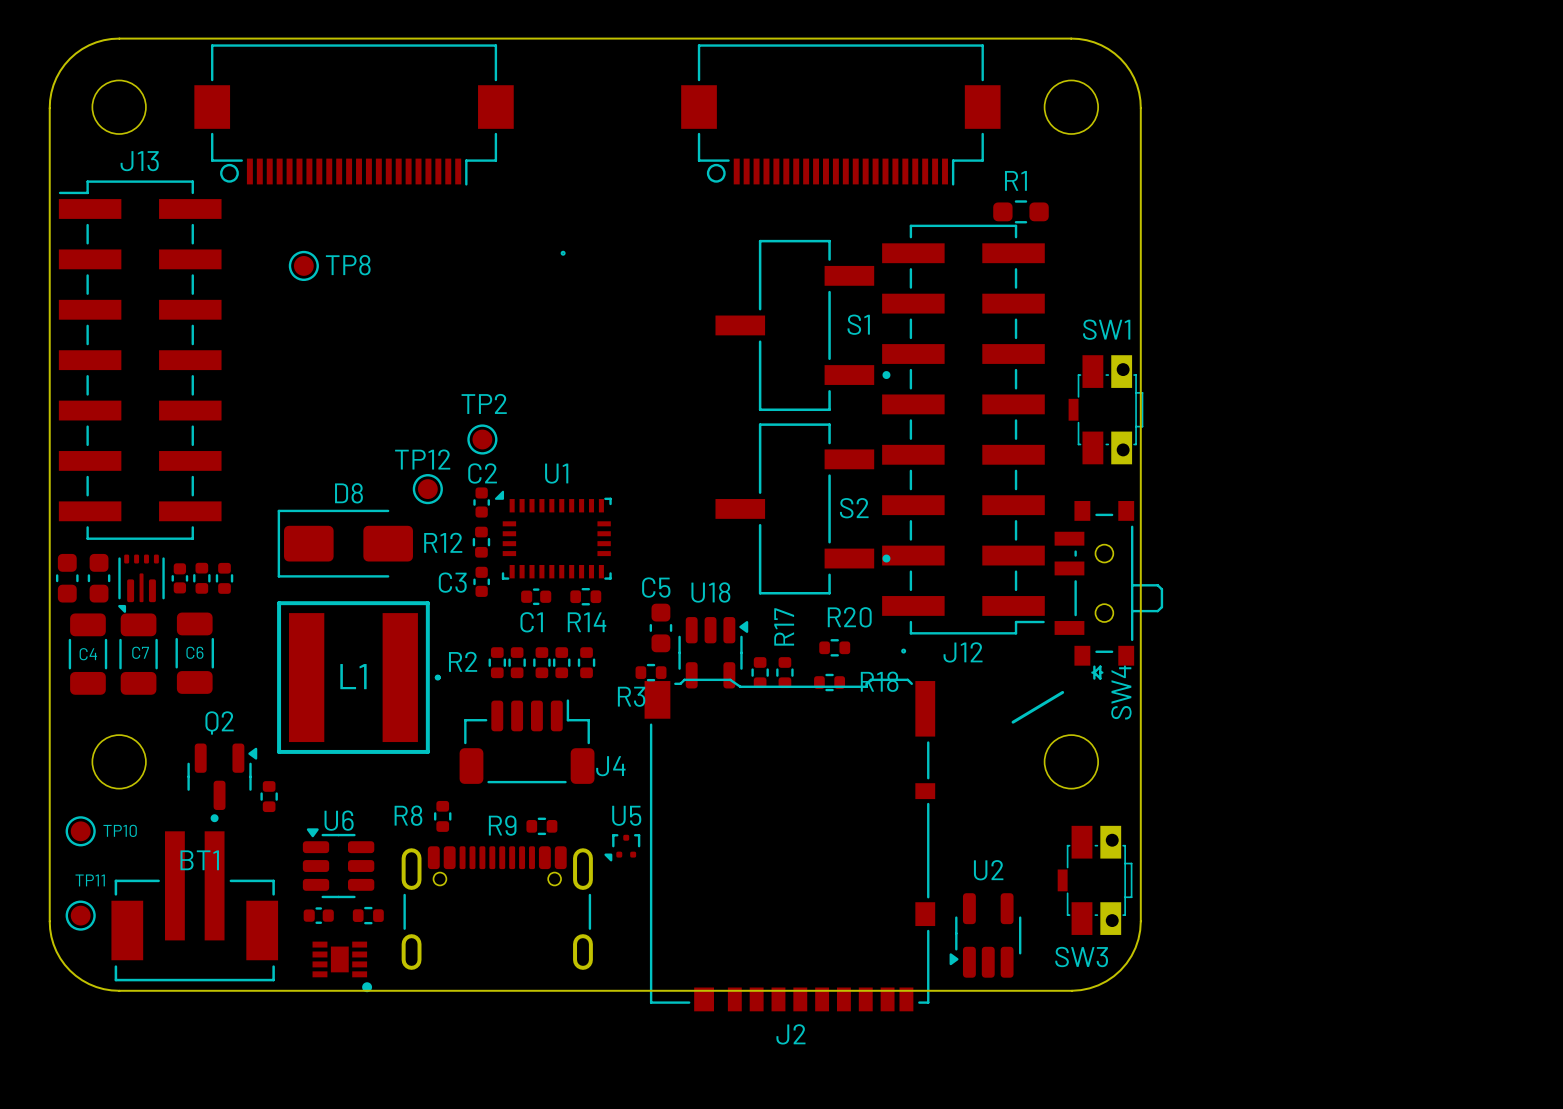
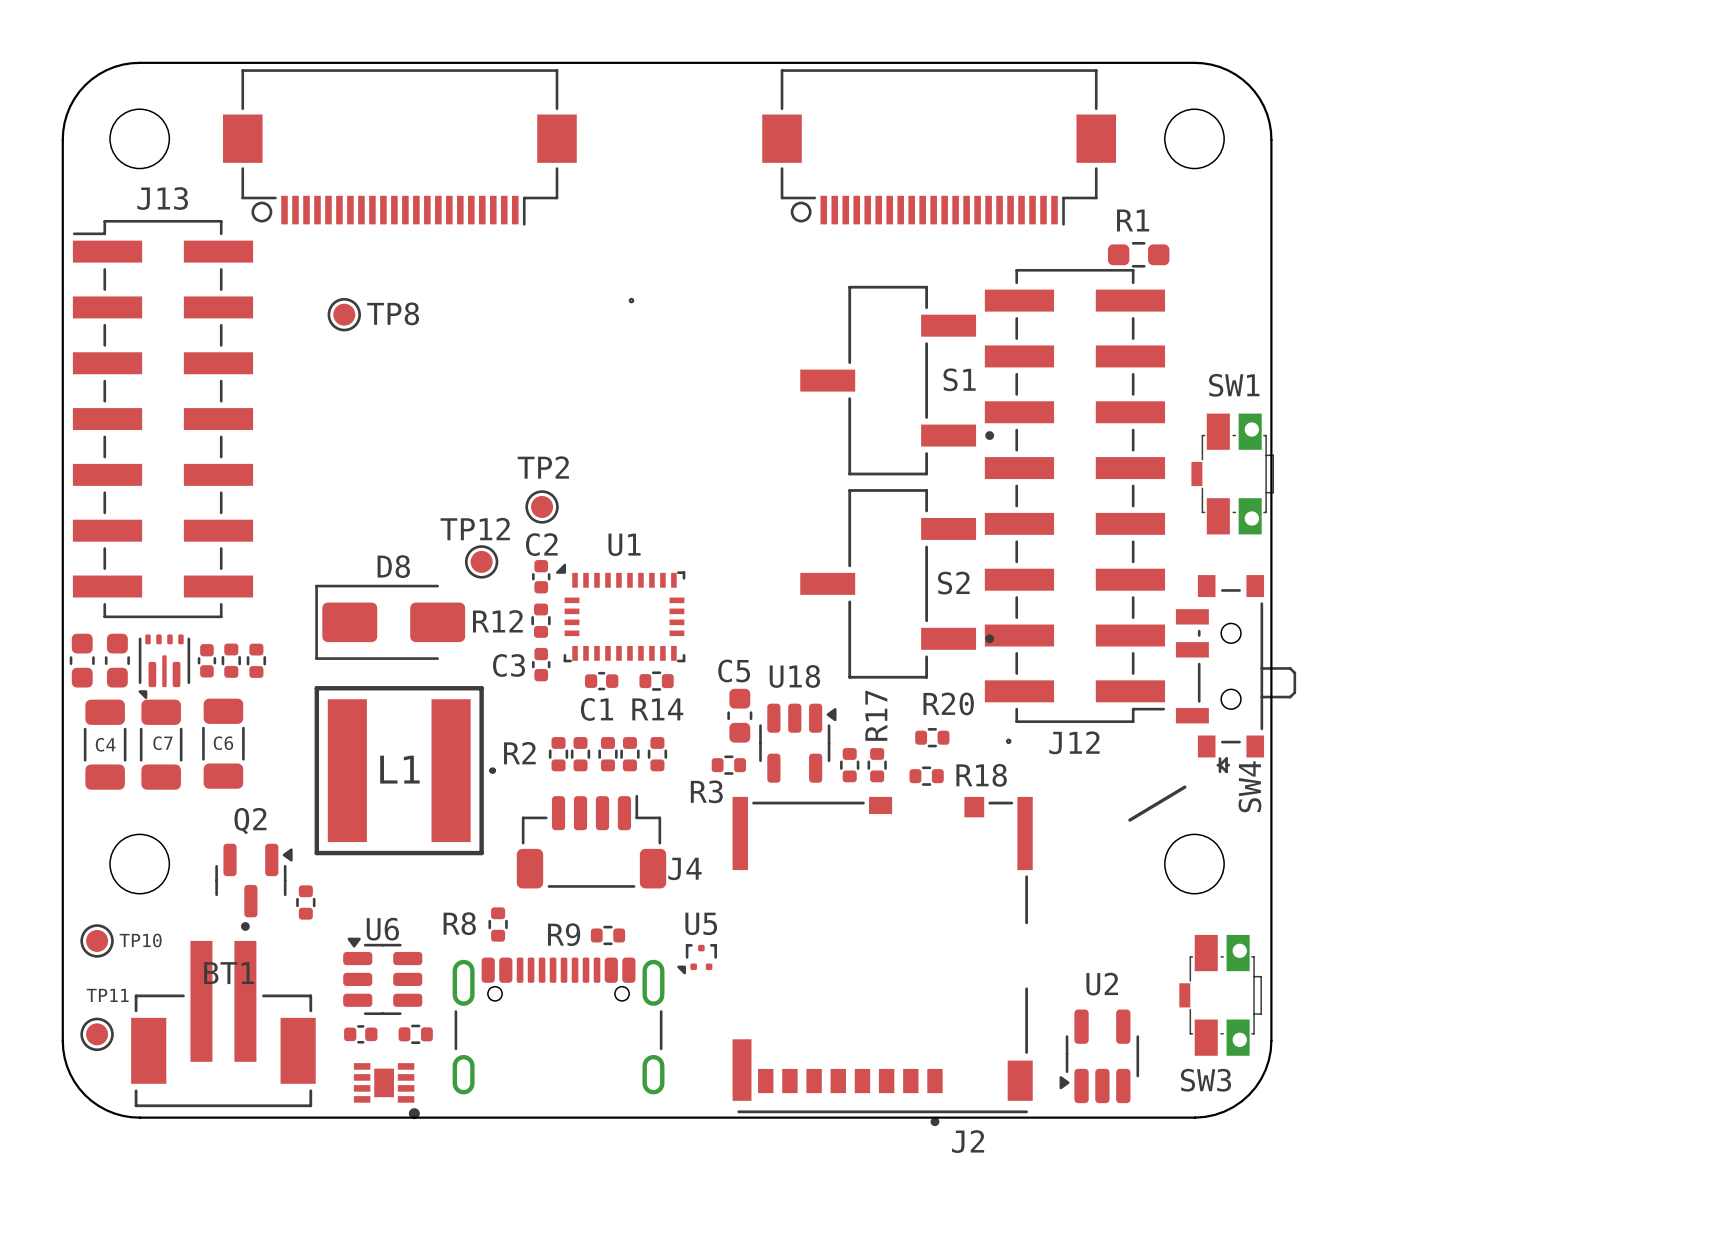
J2 footprint: [644, 678, 936, 1012] -> [732, 796, 1033, 1127]
J2 name position: J2 (790, 1034) -> J2 (968, 1141)

